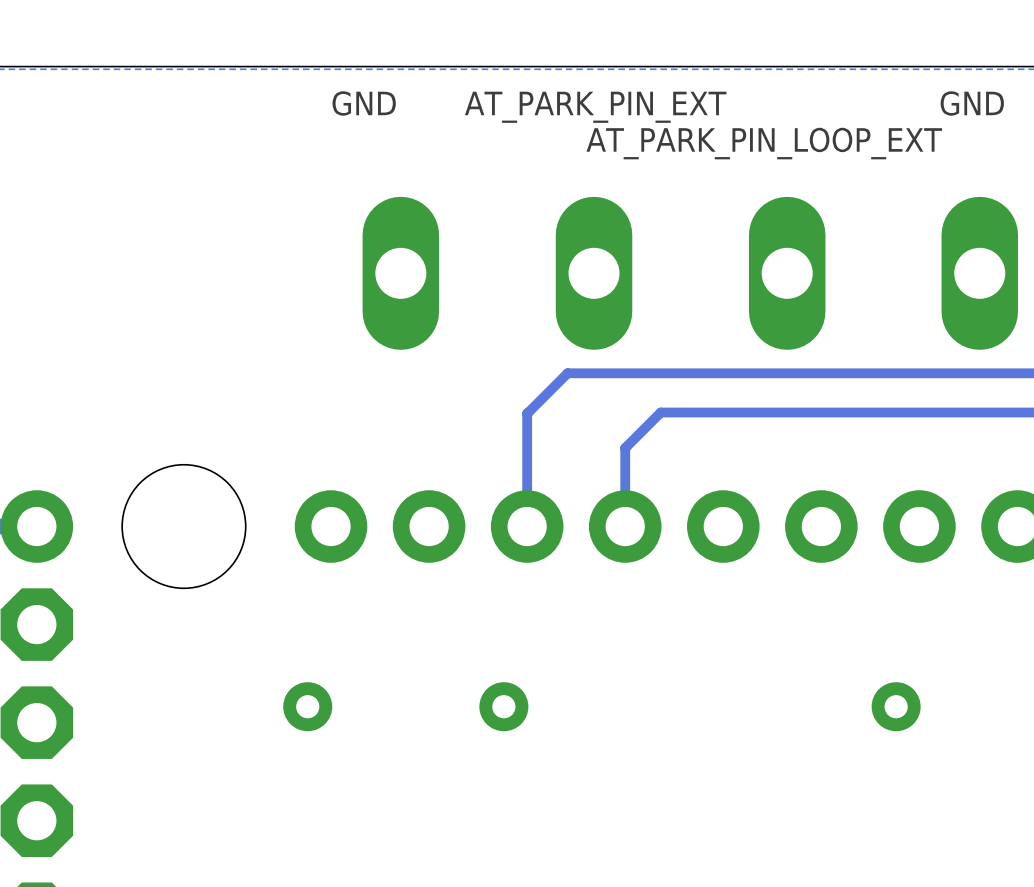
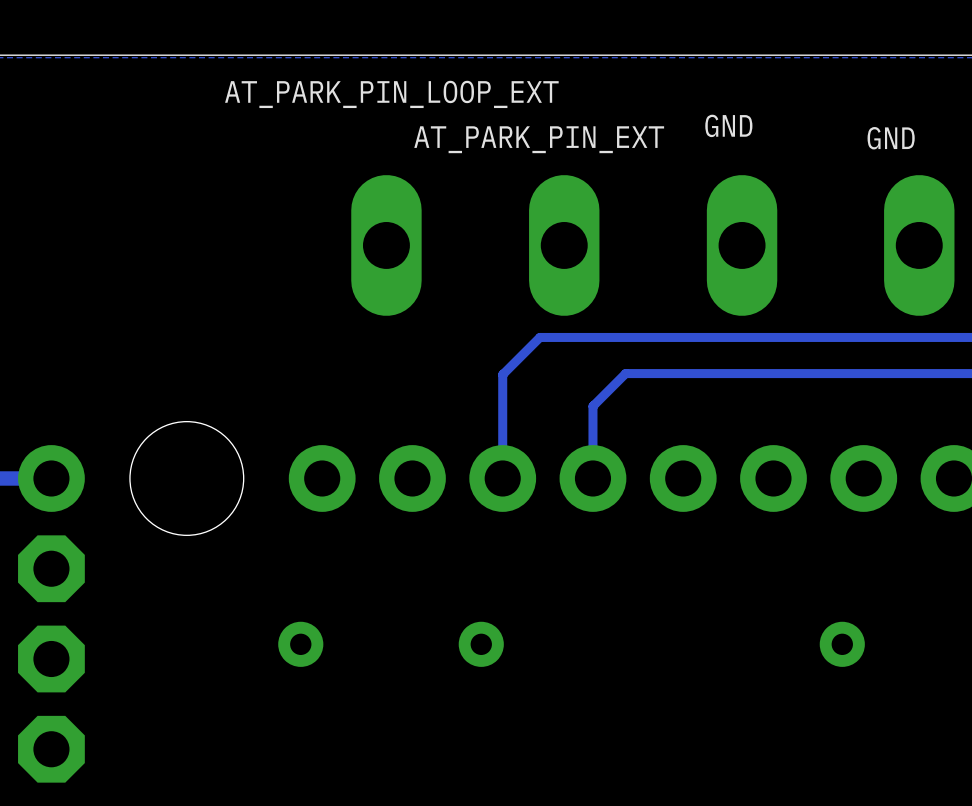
text: GND (364, 103) -> none
text position: GND (972, 103) -> GND (891, 138)
text position: AT_PARK_PIN_EXT (595, 107) -> AT_PARK_PIN_EXT (539, 139)
text position: AT_PARK_PIN_LOOP_EXT (764, 143) -> AT_PARK_PIN_LOOP_EXT (391, 94)
text: none -> GND (728, 125)

